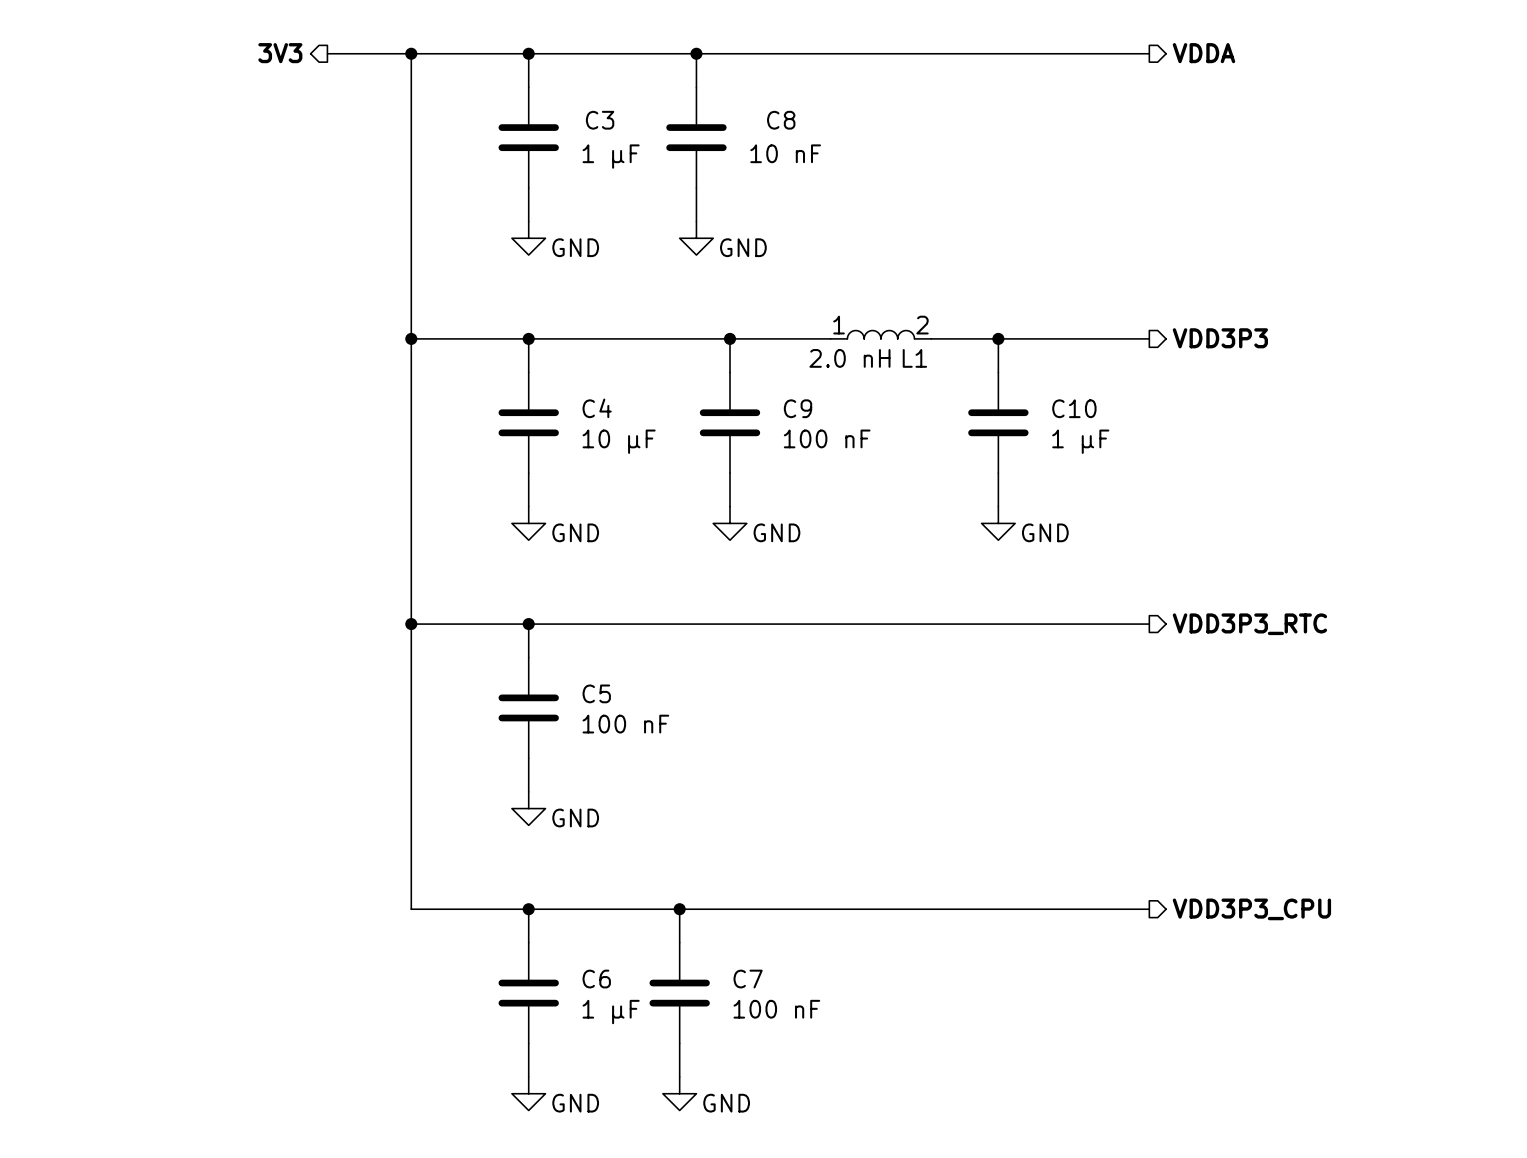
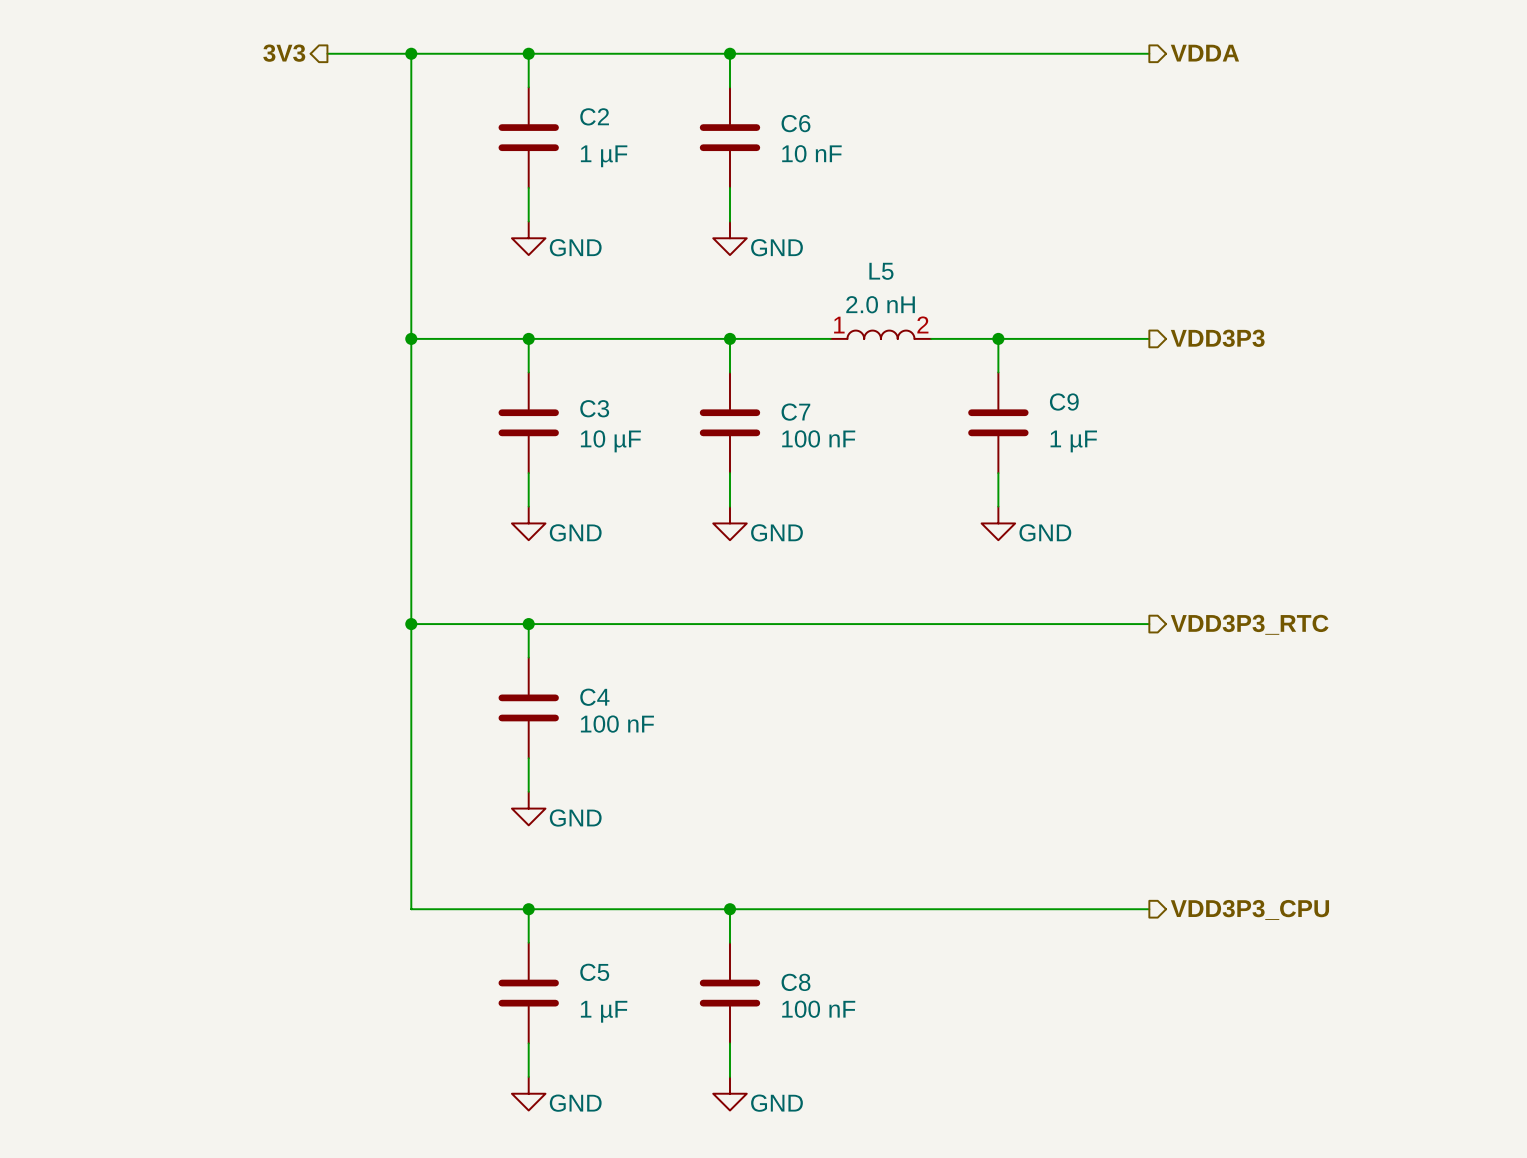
wire: (696, 53) (696, 87) -> (729, 53) (729, 87)
junction position: (696, 53) -> (729, 53)
C3 name: C3 (600, 120) -> C2 (594, 116)
C8 name position: C8 (781, 120) -> C8 (795, 982)
C8 position: (696, 137) -> (729, 993)
C6: none -> (729, 137)
C8 text: 10 nF (785, 153) -> 100 nF (818, 1009)
wire: (696, 187) (696, 221) -> (729, 187) (729, 221)
power symbol position: GND (696, 238) -> GND (729, 238)
L1 text position: 2.0 nH (849, 358) -> 2.0 nH (880, 304)
L1 name: L1 (914, 358) -> L5 (881, 271)
C4 name: C4 (597, 408) -> C3 (594, 408)
C9 name: C9 (798, 408) -> C7 (795, 412)
C10 name: C10 (1074, 408) -> C9 (1064, 402)
C5 name: C5 (596, 693) -> C4 (594, 697)
wire: (679, 909) (679, 942) -> (729, 909) (729, 942)
junction position: (679, 909) -> (729, 909)
C6 name: C6 (596, 979) -> C5 (594, 972)
C7: (679, 993) -> none
wire: (679, 1043) (679, 1076) -> (729, 1043) (729, 1076)
power symbol position: GND (679, 1093) -> GND (729, 1093)

